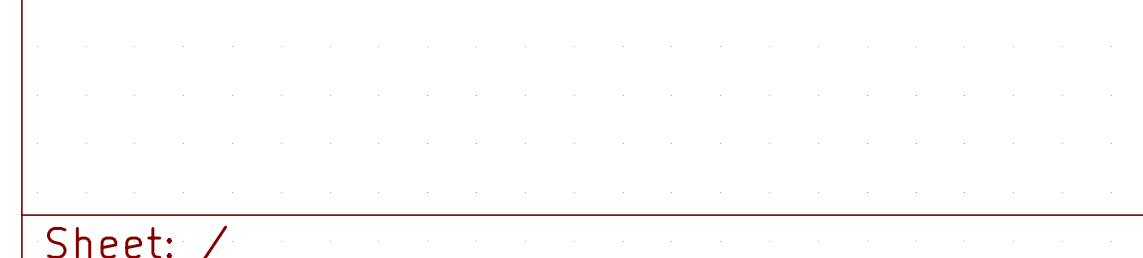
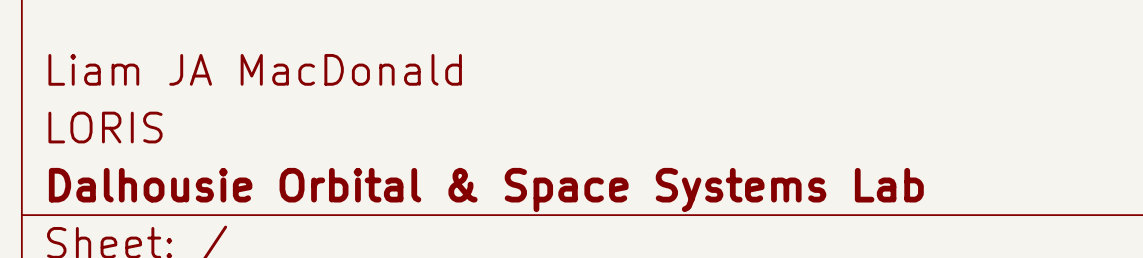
title block: none -> Liam JA MacDonald (255, 69)
title block: none -> LORIS (105, 127)
title block: none -> Dalhousie Orbital & Space Systems Lab (486, 190)

